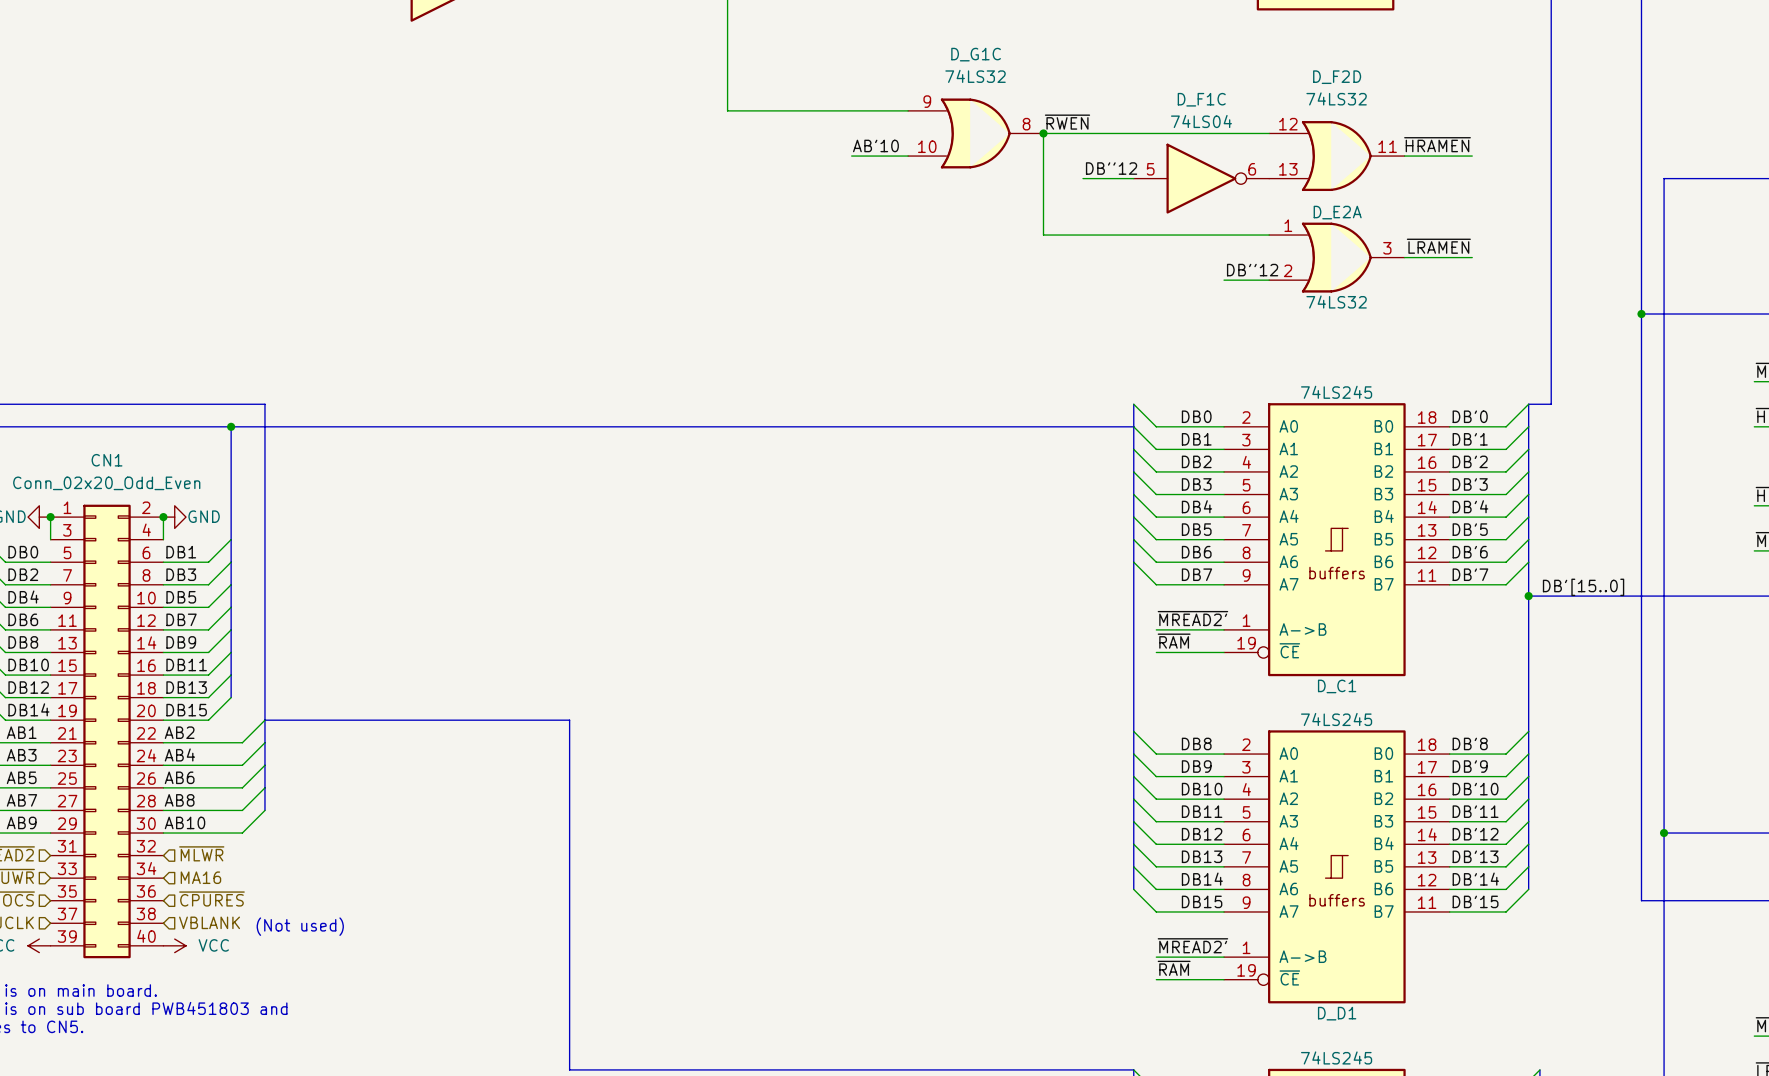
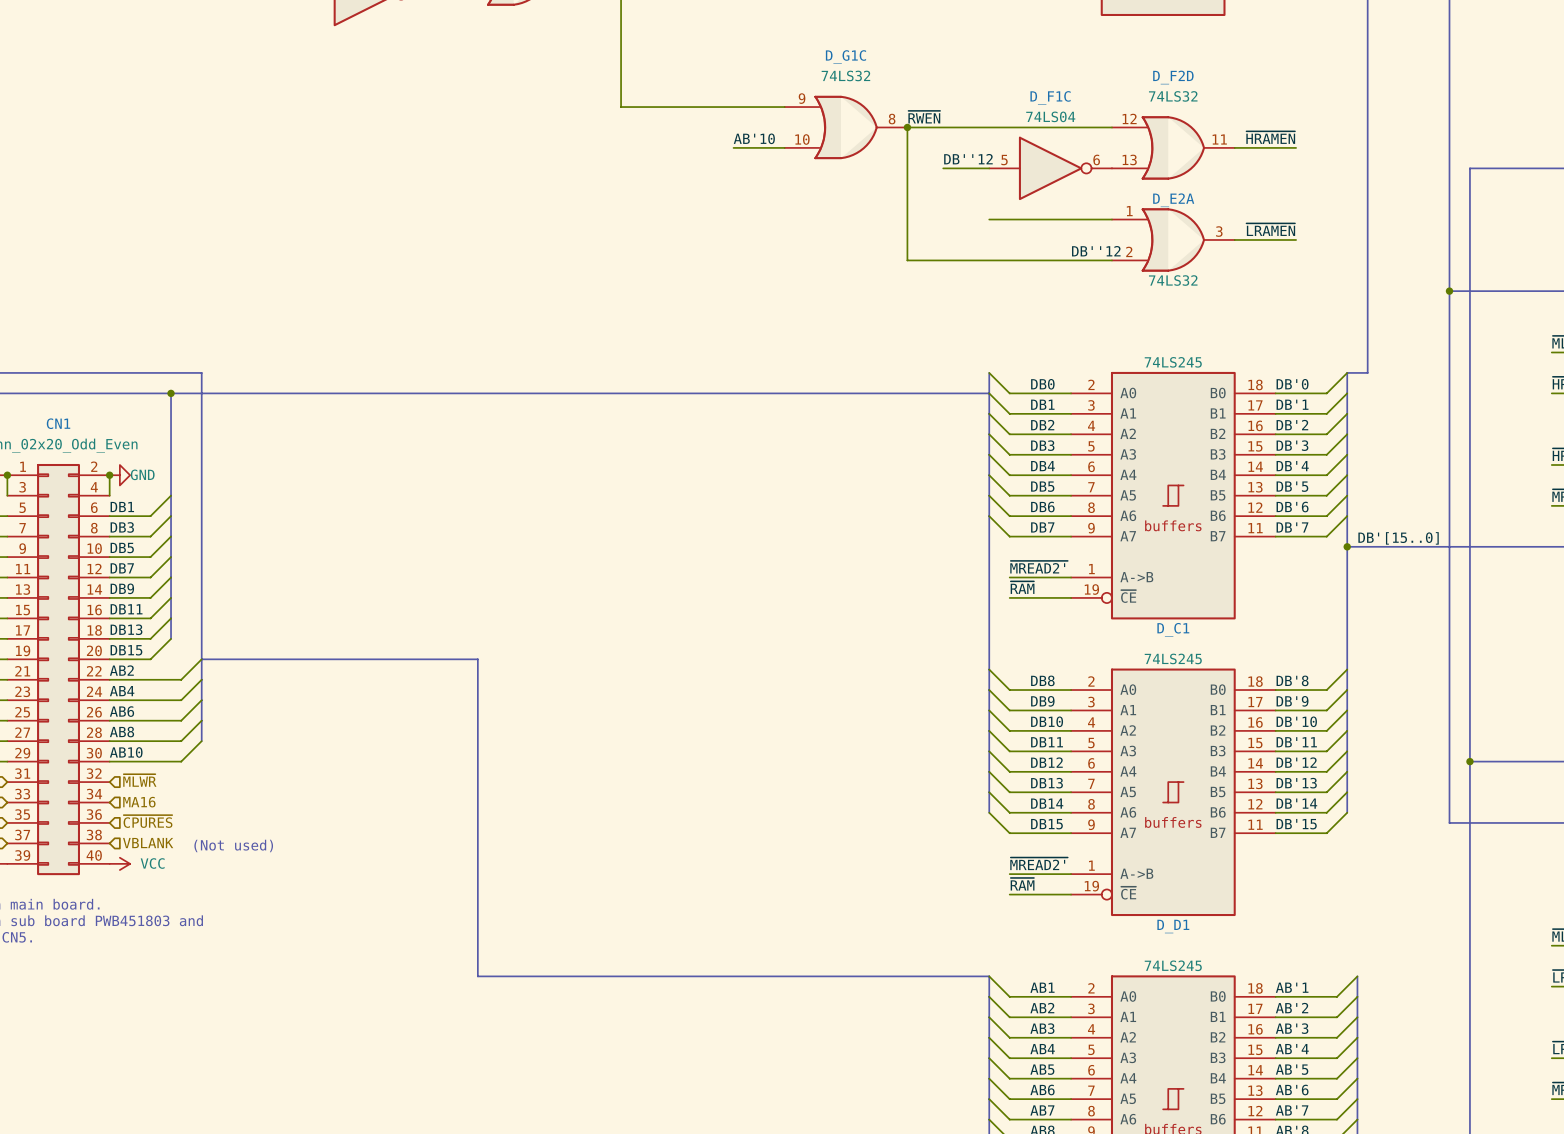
wire: (1043, 235) (1133, 235) -> (907, 219) (907, 260) (1071, 260)

